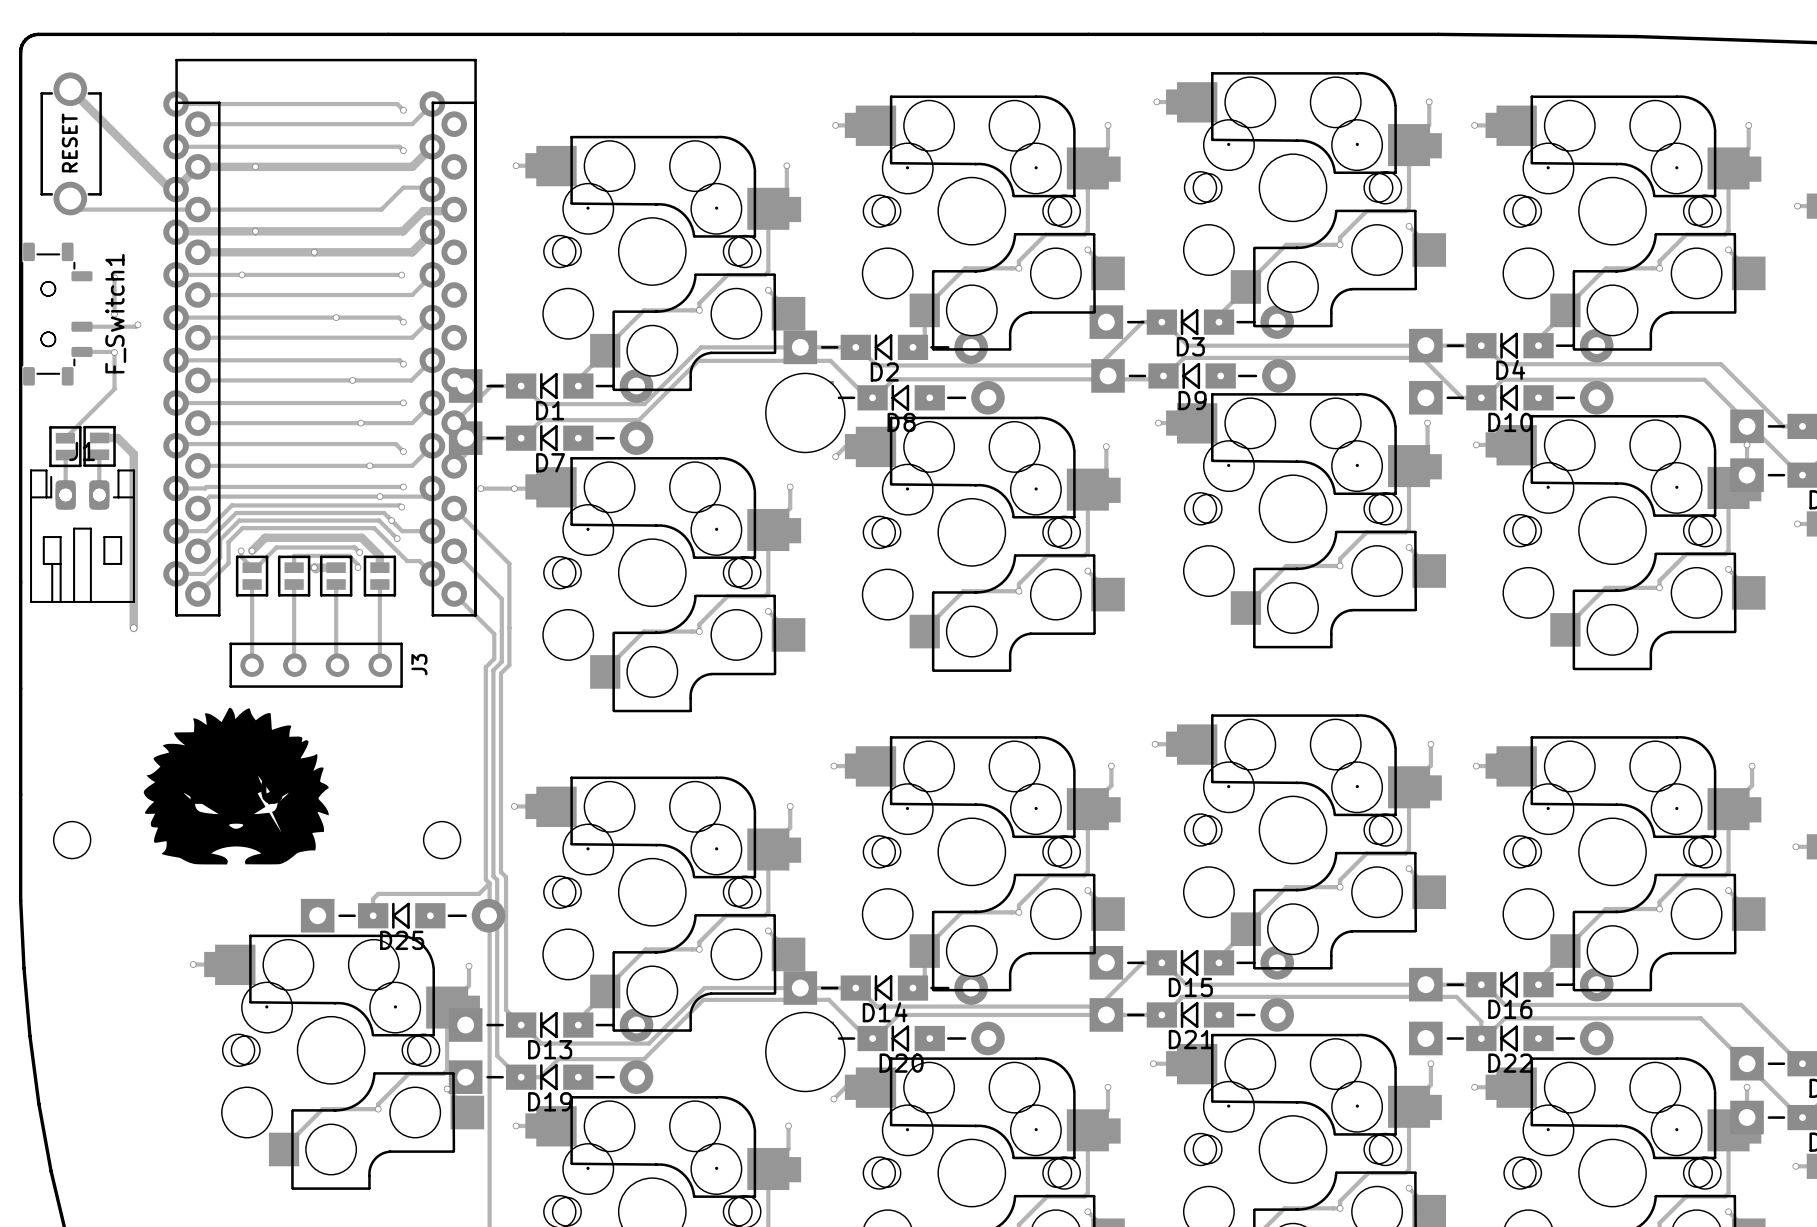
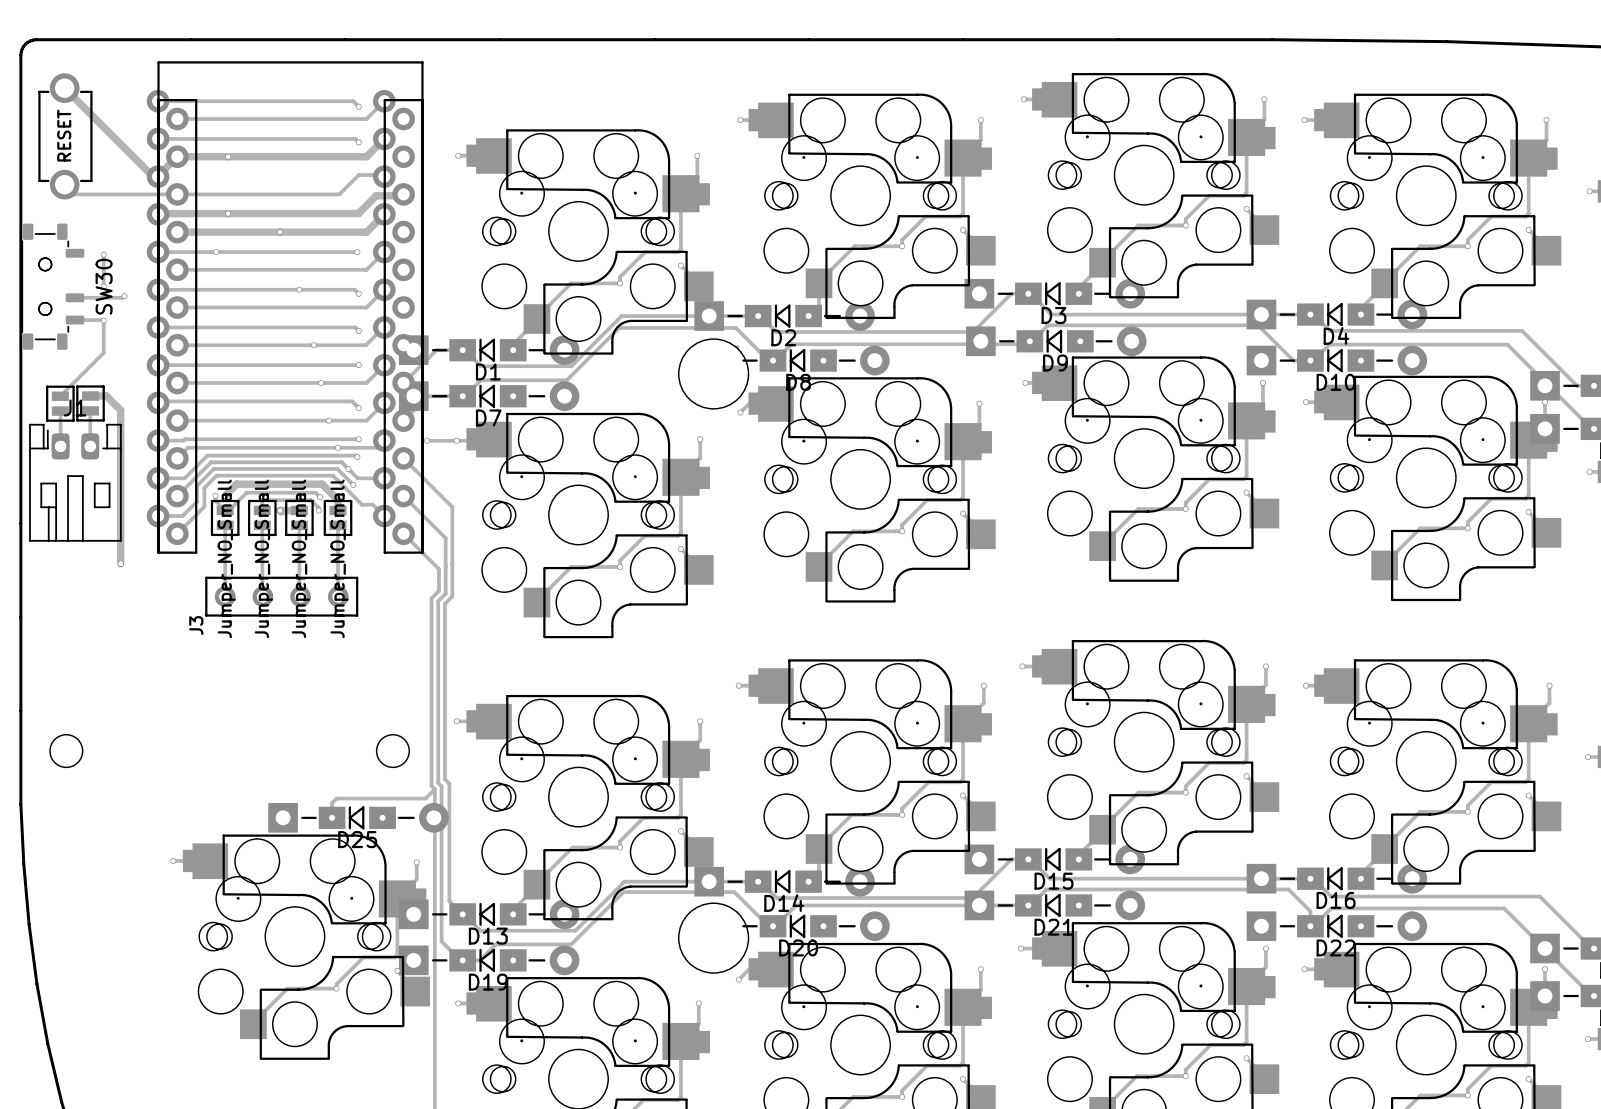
F_Switch1 name: F_Switch1 (115, 313) -> SW30 (104, 286)
part value: none -> Jumper_NO_Small (226, 558)
part value: none -> Jumper_NO_Small (263, 558)
part value: none -> Jumper_NO_Small (300, 558)
part value: none -> Jumper_NO_Small (339, 558)
J3 name position: J3 (419, 664) -> J3 (196, 625)
part: (236, 786) -> none

